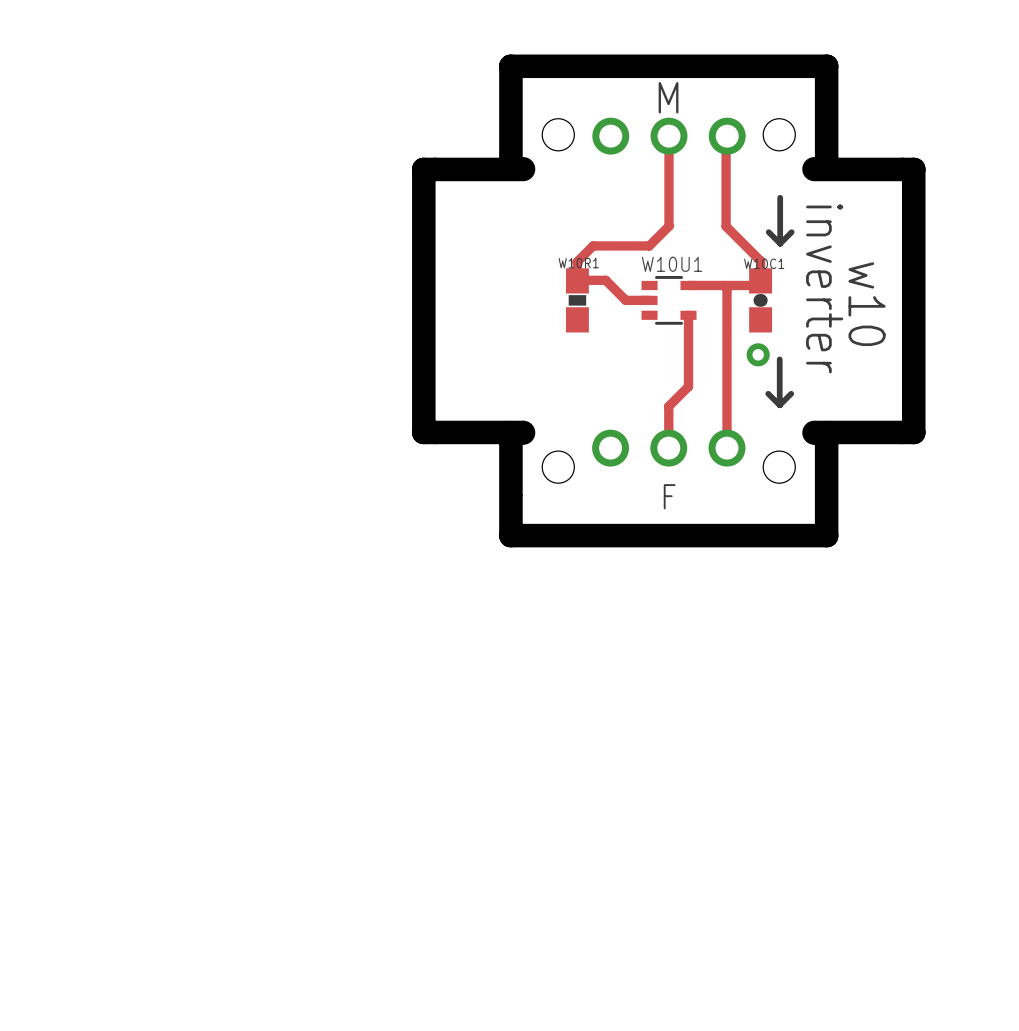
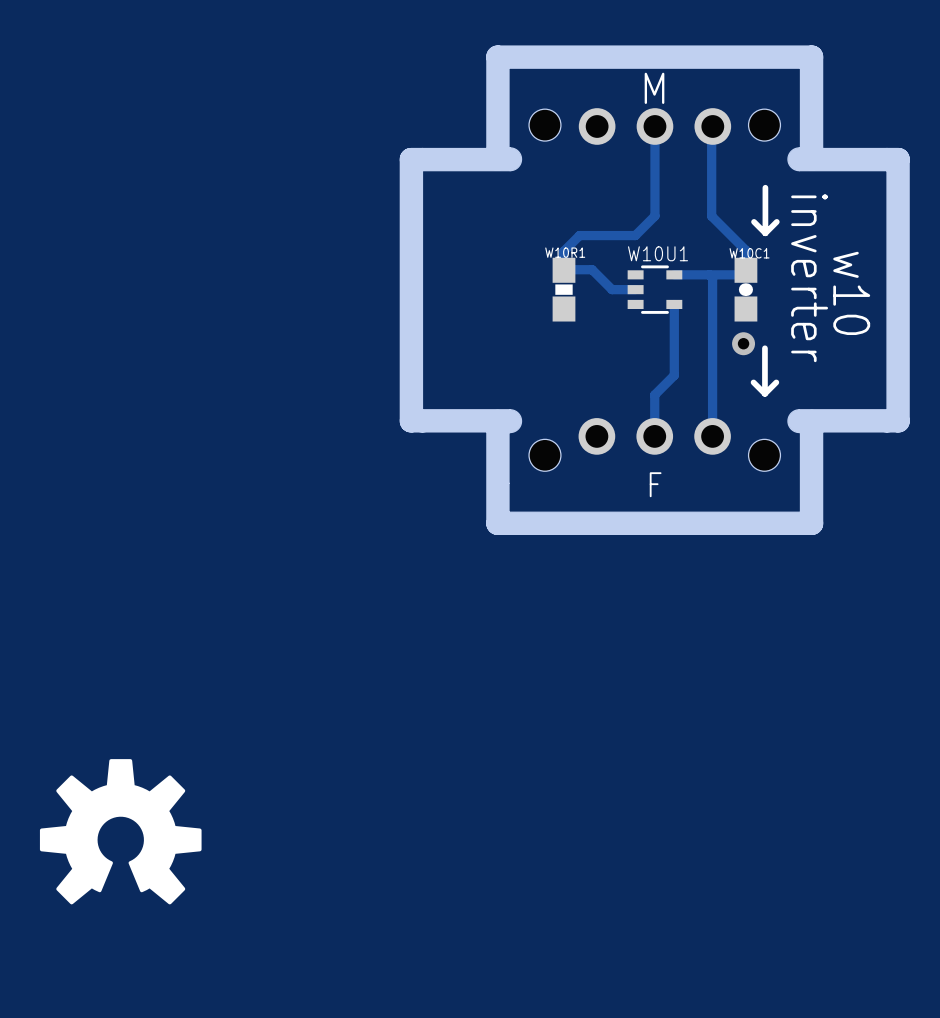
drawing: none -> [39, 759, 202, 905]

